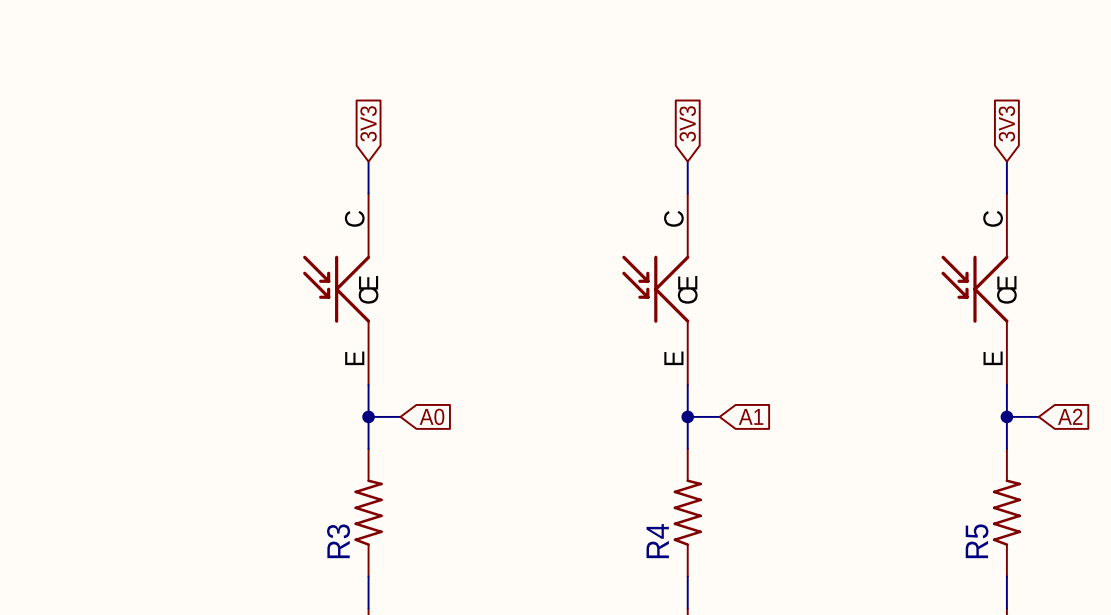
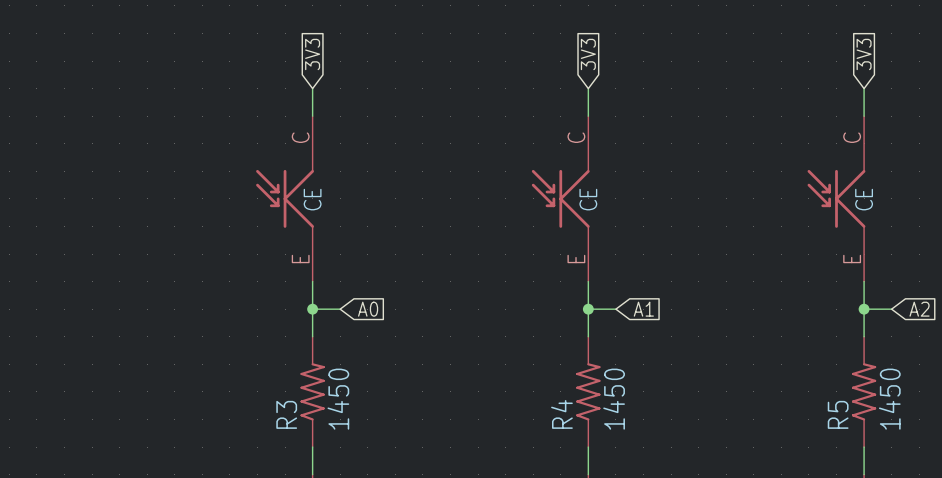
R3 value: none -> 1450 (338, 399)
R4 value: none -> 1450 (614, 399)
R5 value: none -> 1450 (889, 399)

